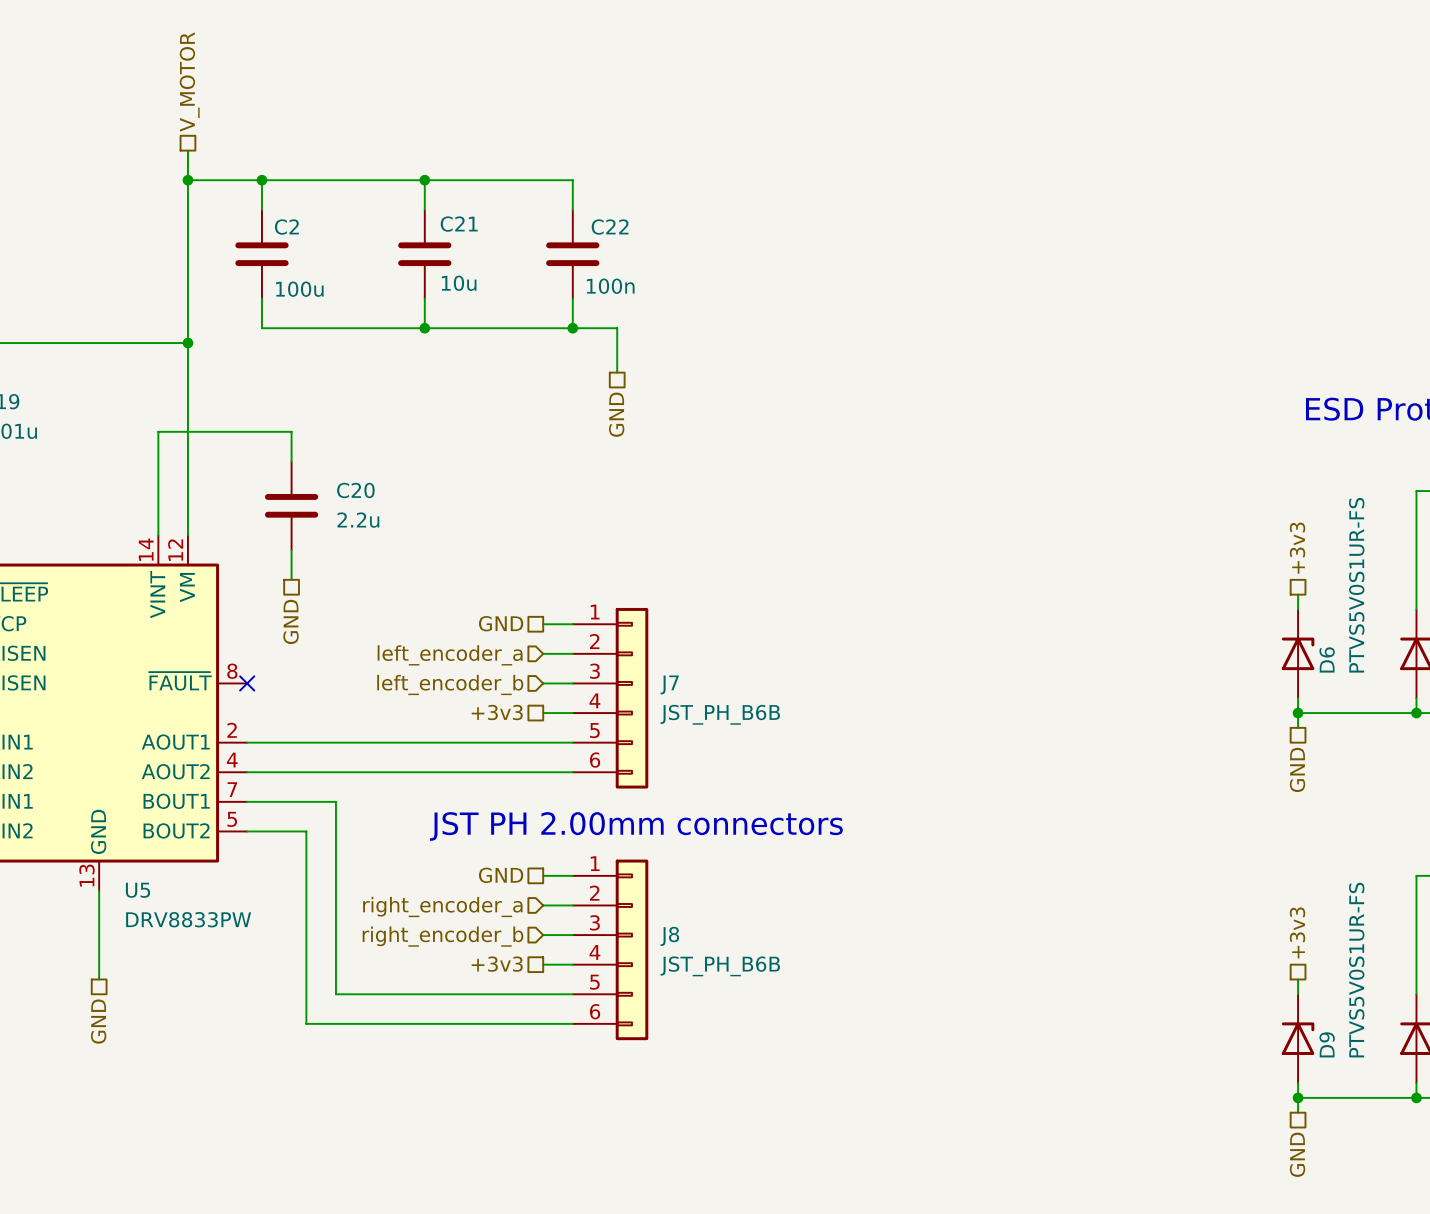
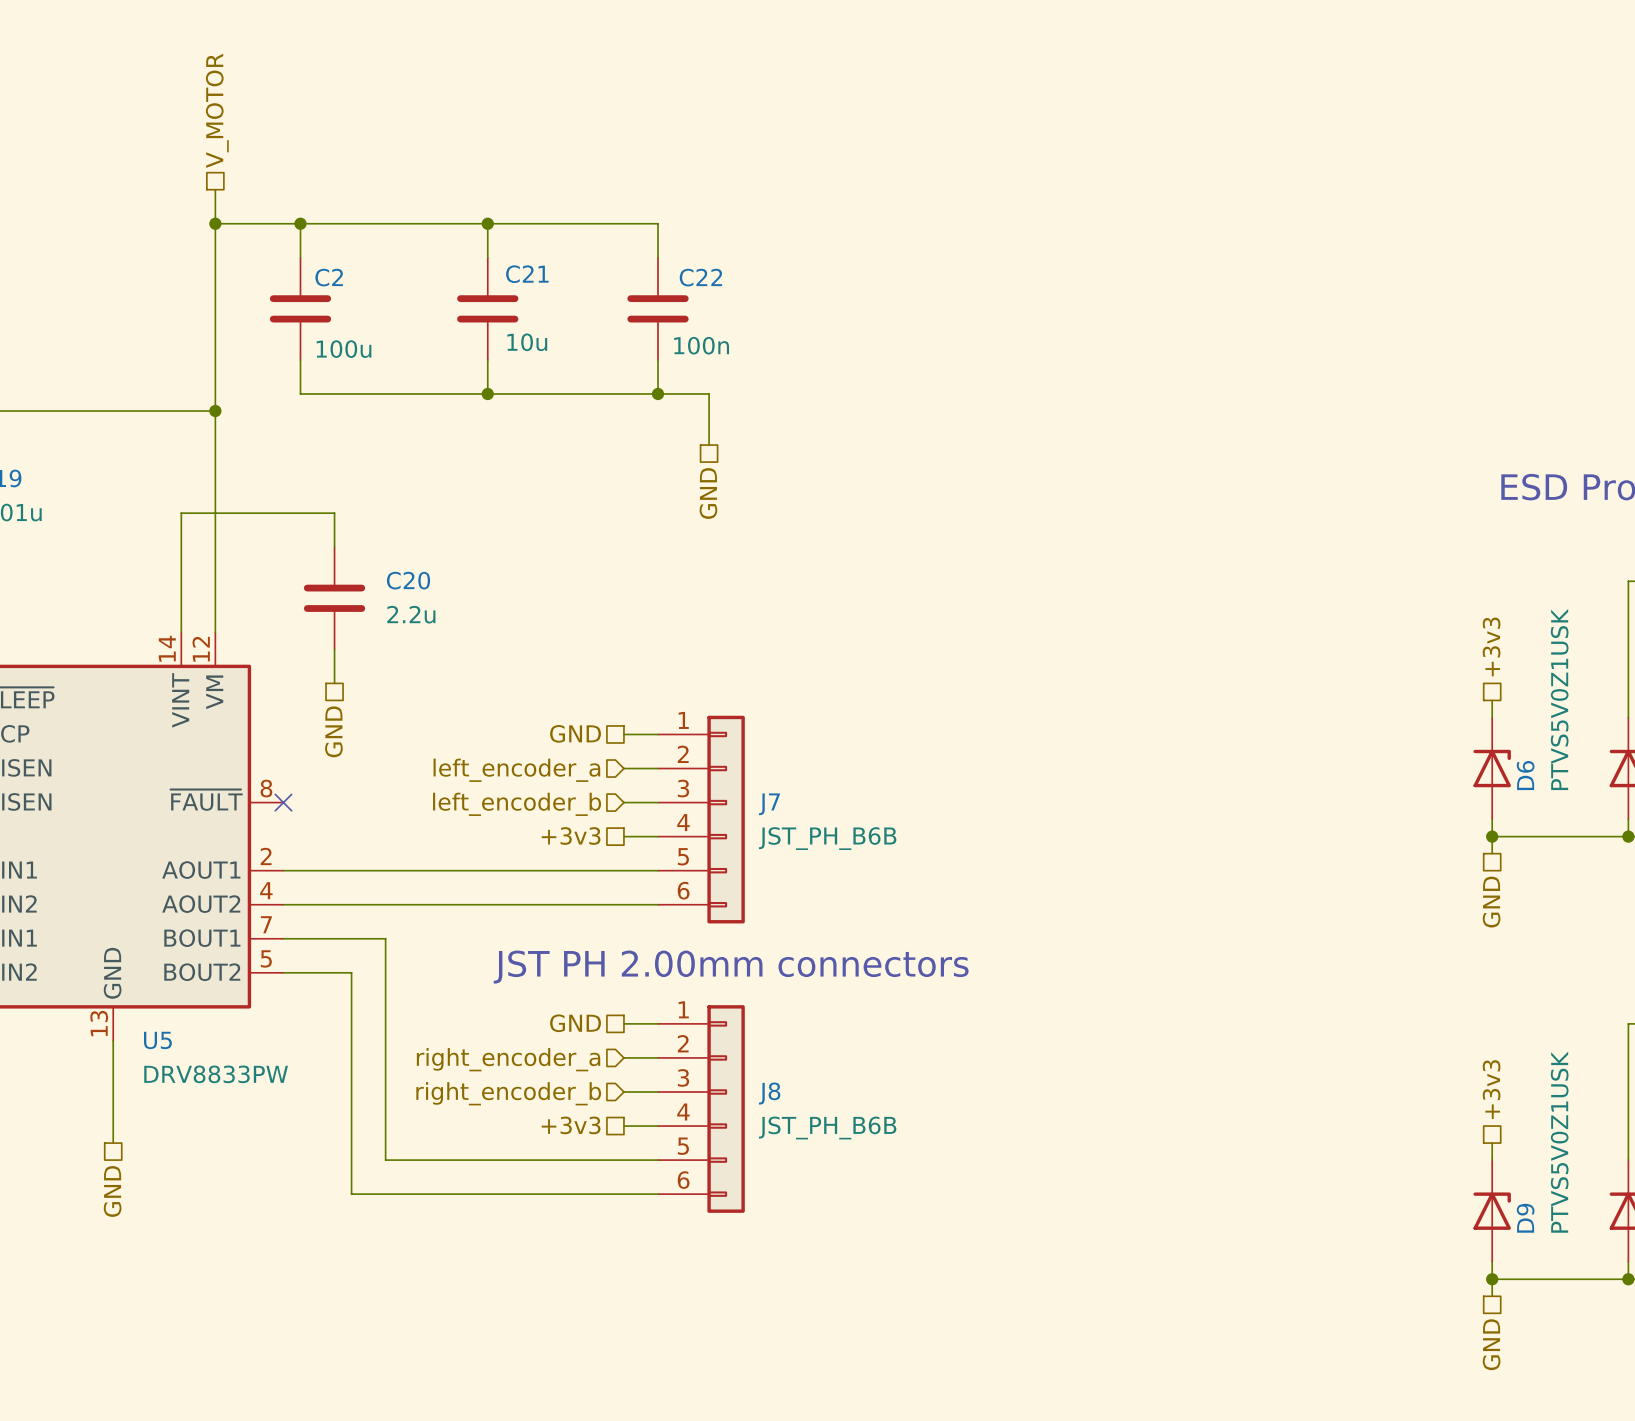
D6 value: PTVS5V0S1UR-FS (1356, 585) -> PTVS5V0Z1USK (1559, 699)
D9 value: PTVS5V0S1UR-FS (1356, 970) -> PTVS5V0Z1USK (1559, 1142)

